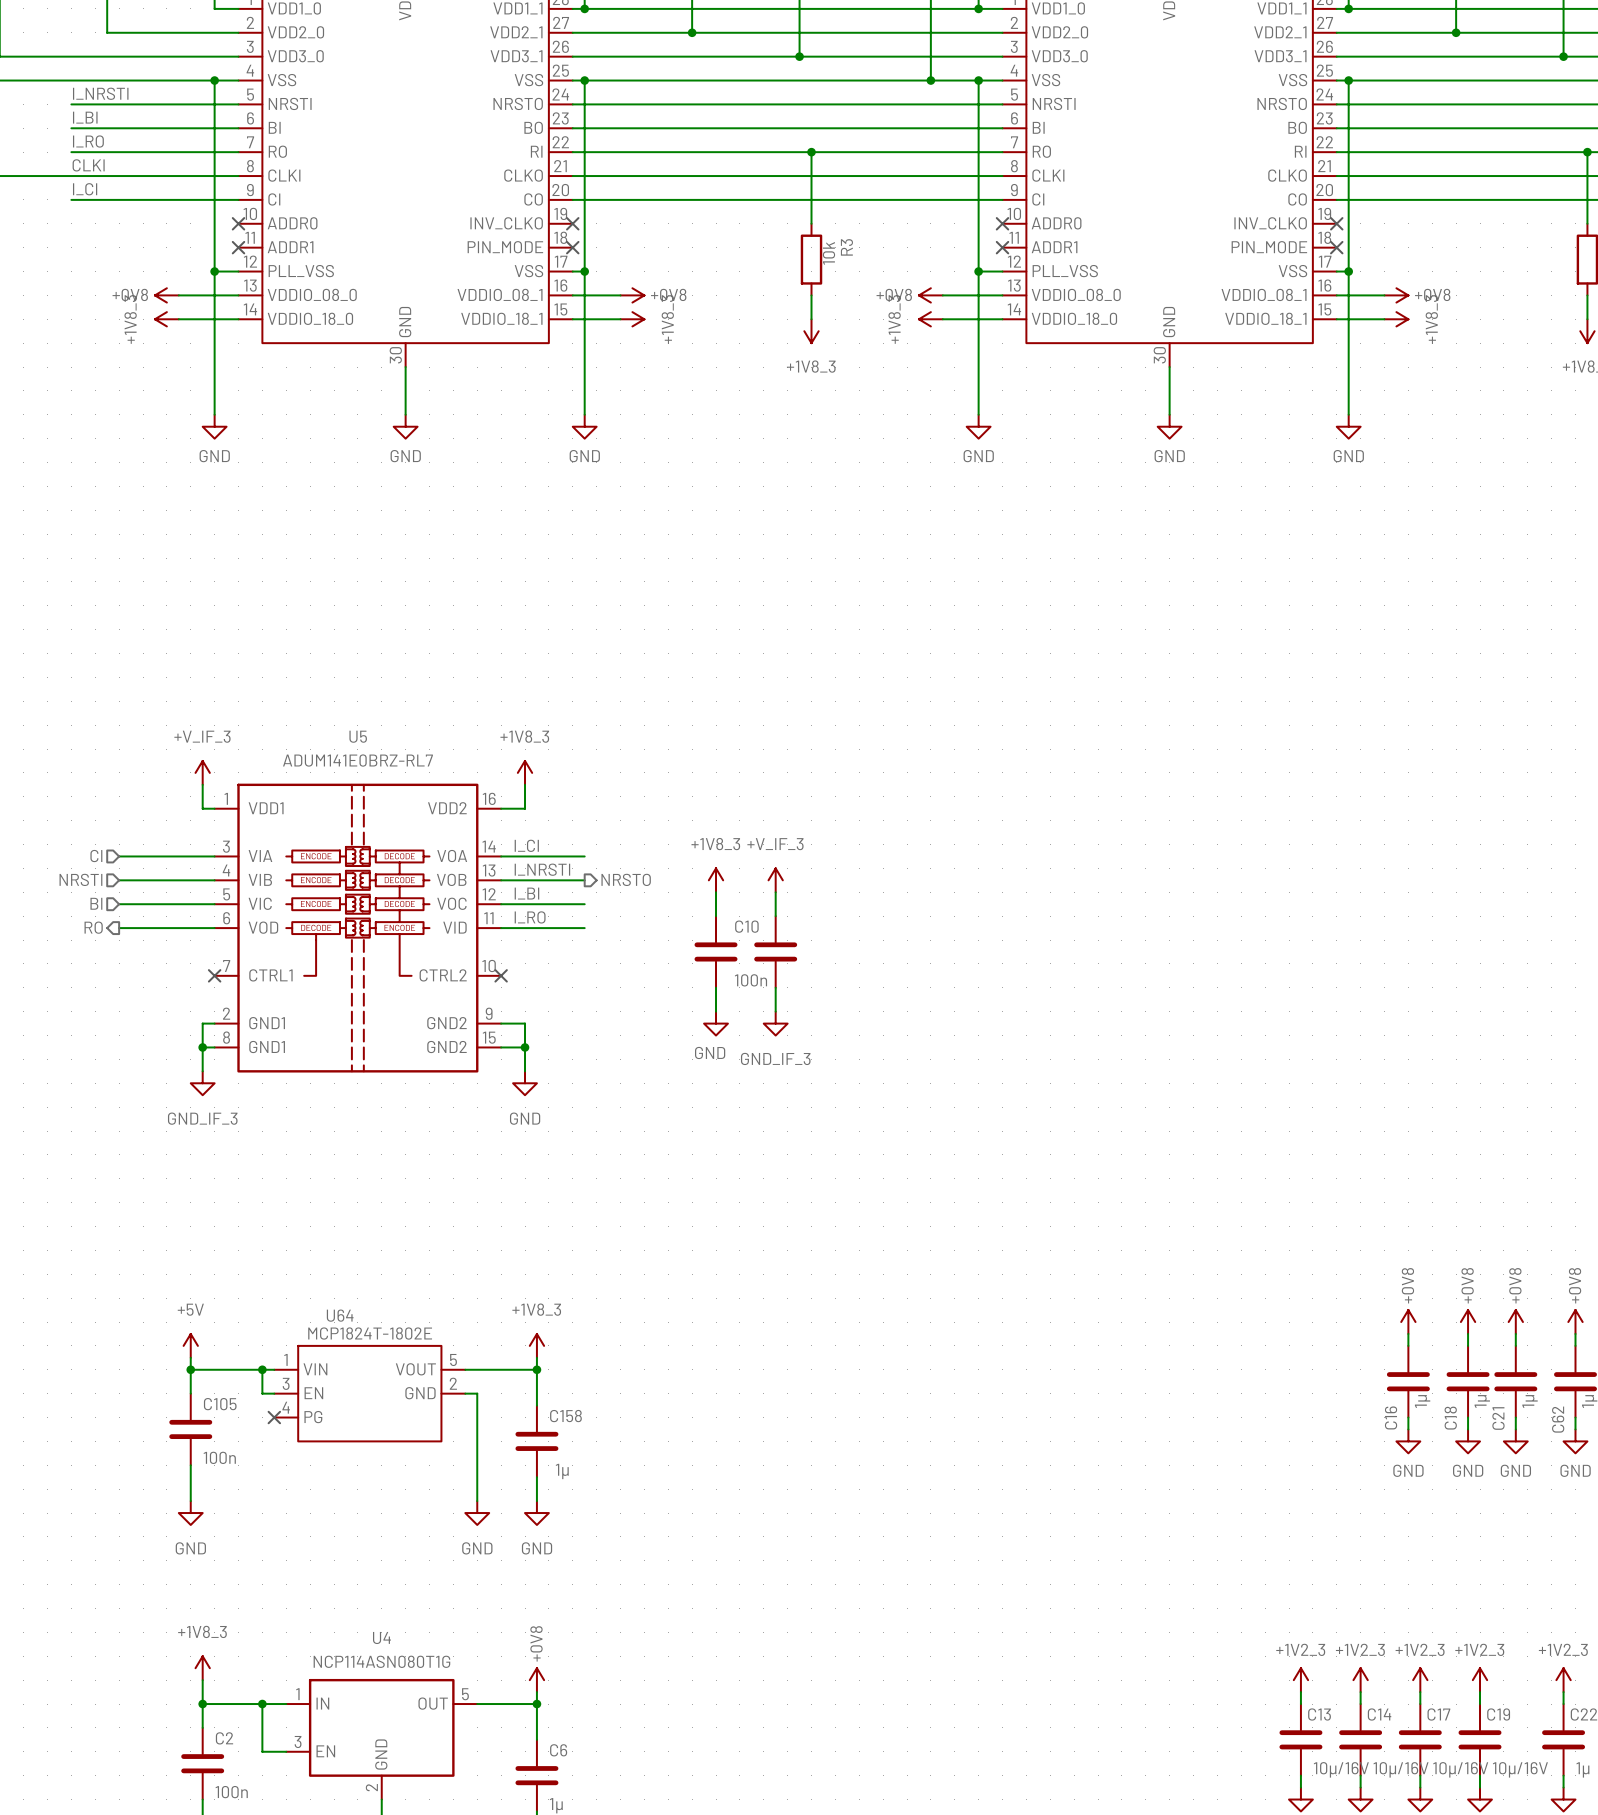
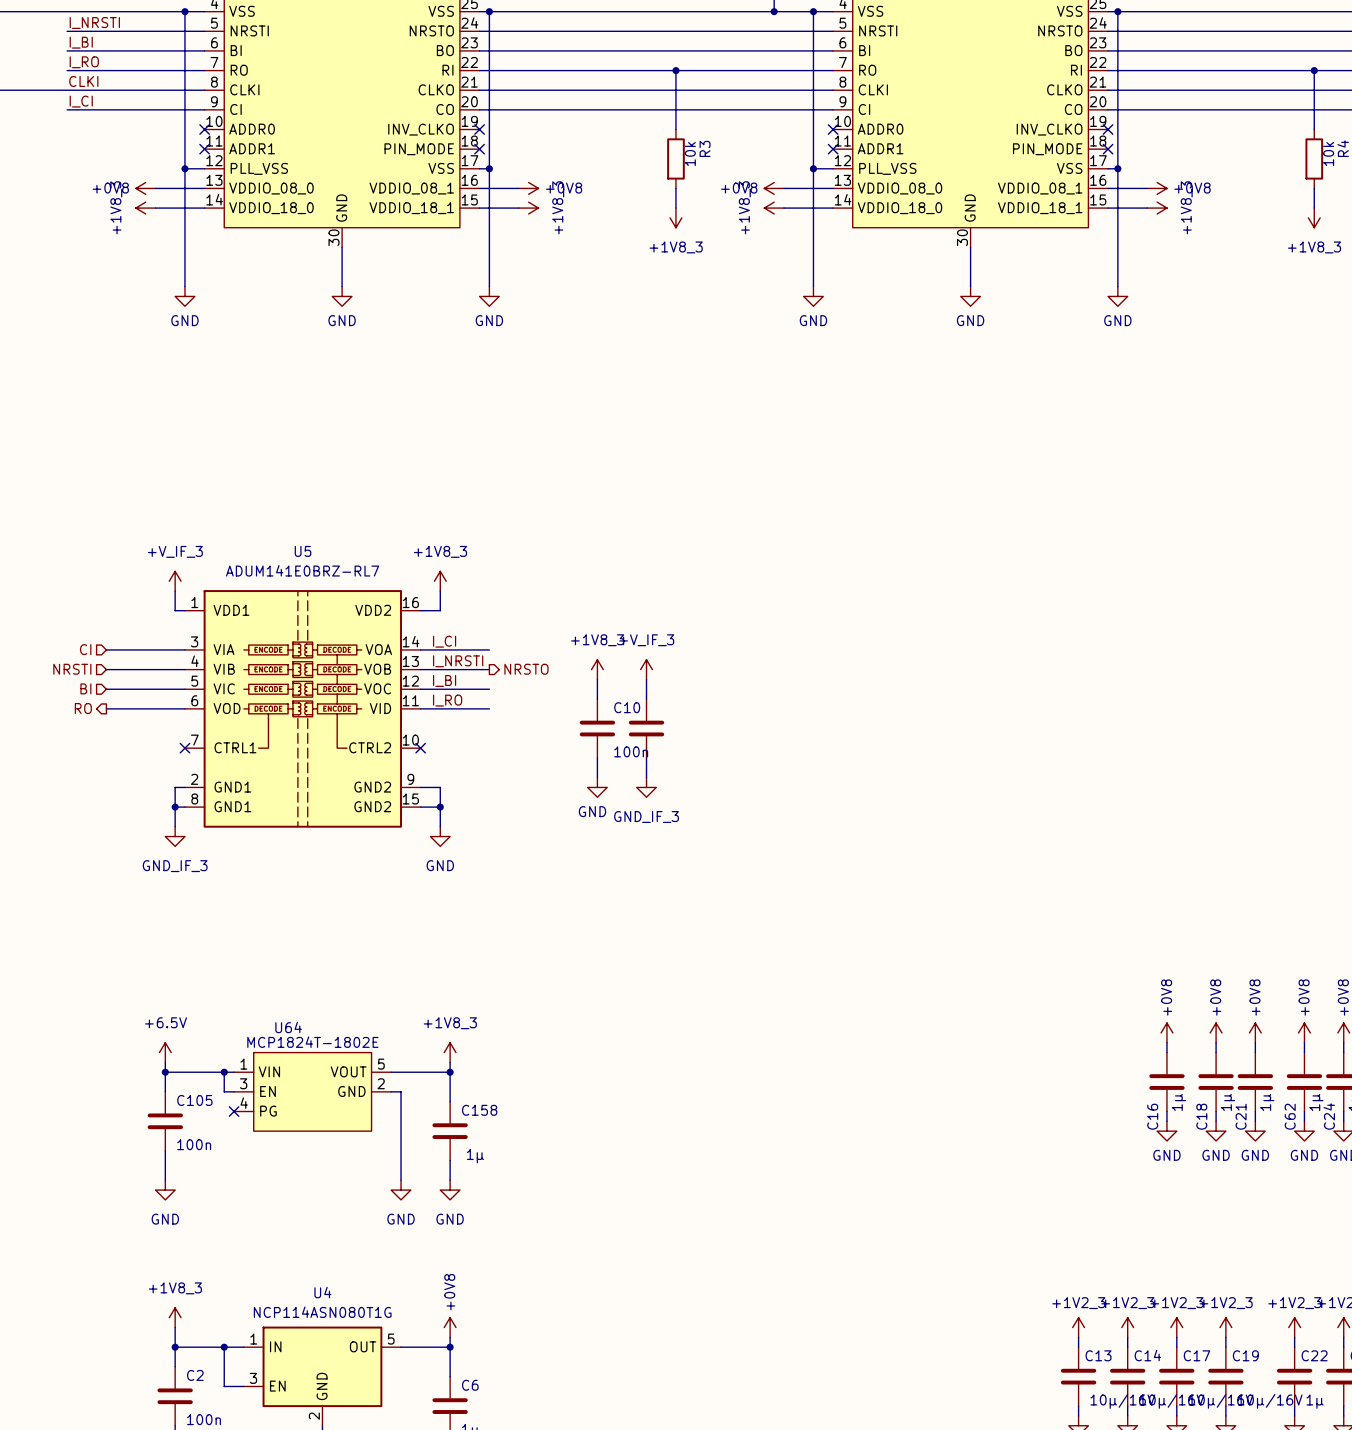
power symbol: +5V (190, 1345) -> +6.5V (165, 1052)

